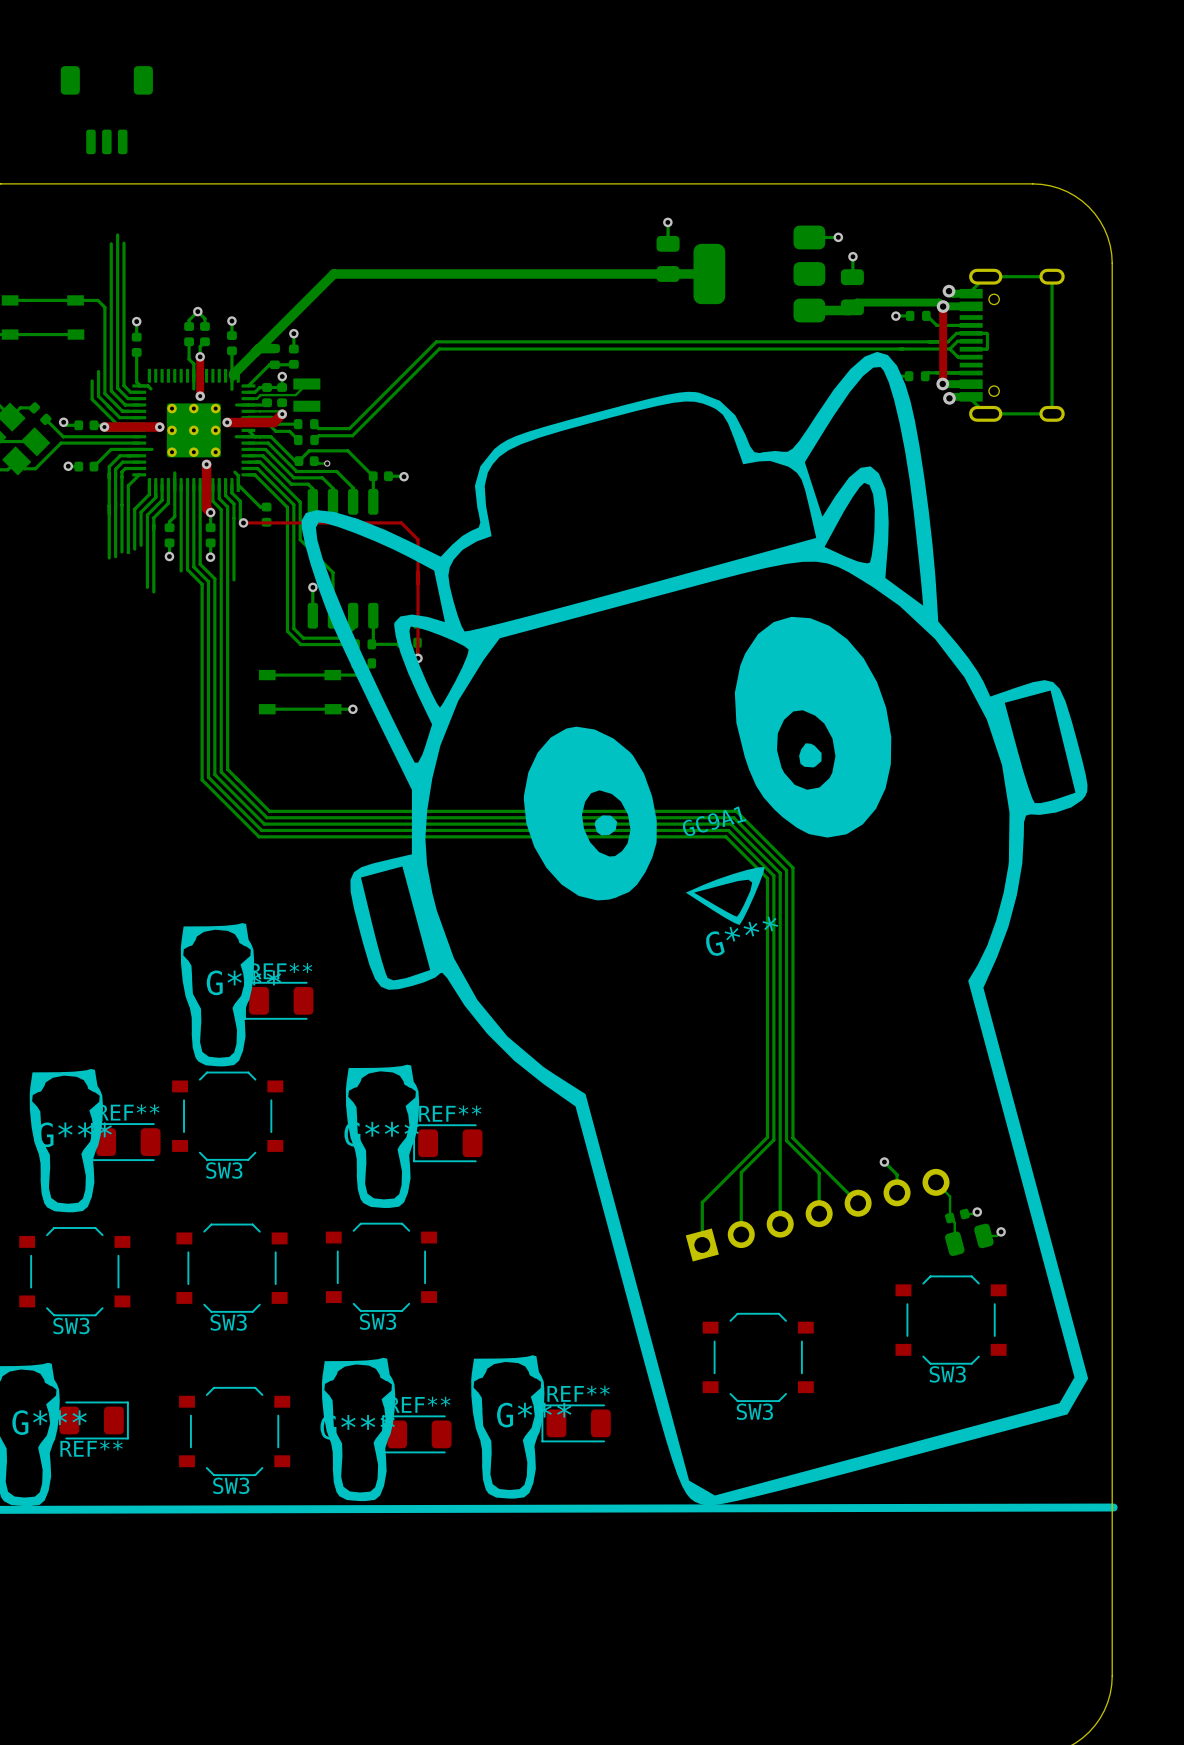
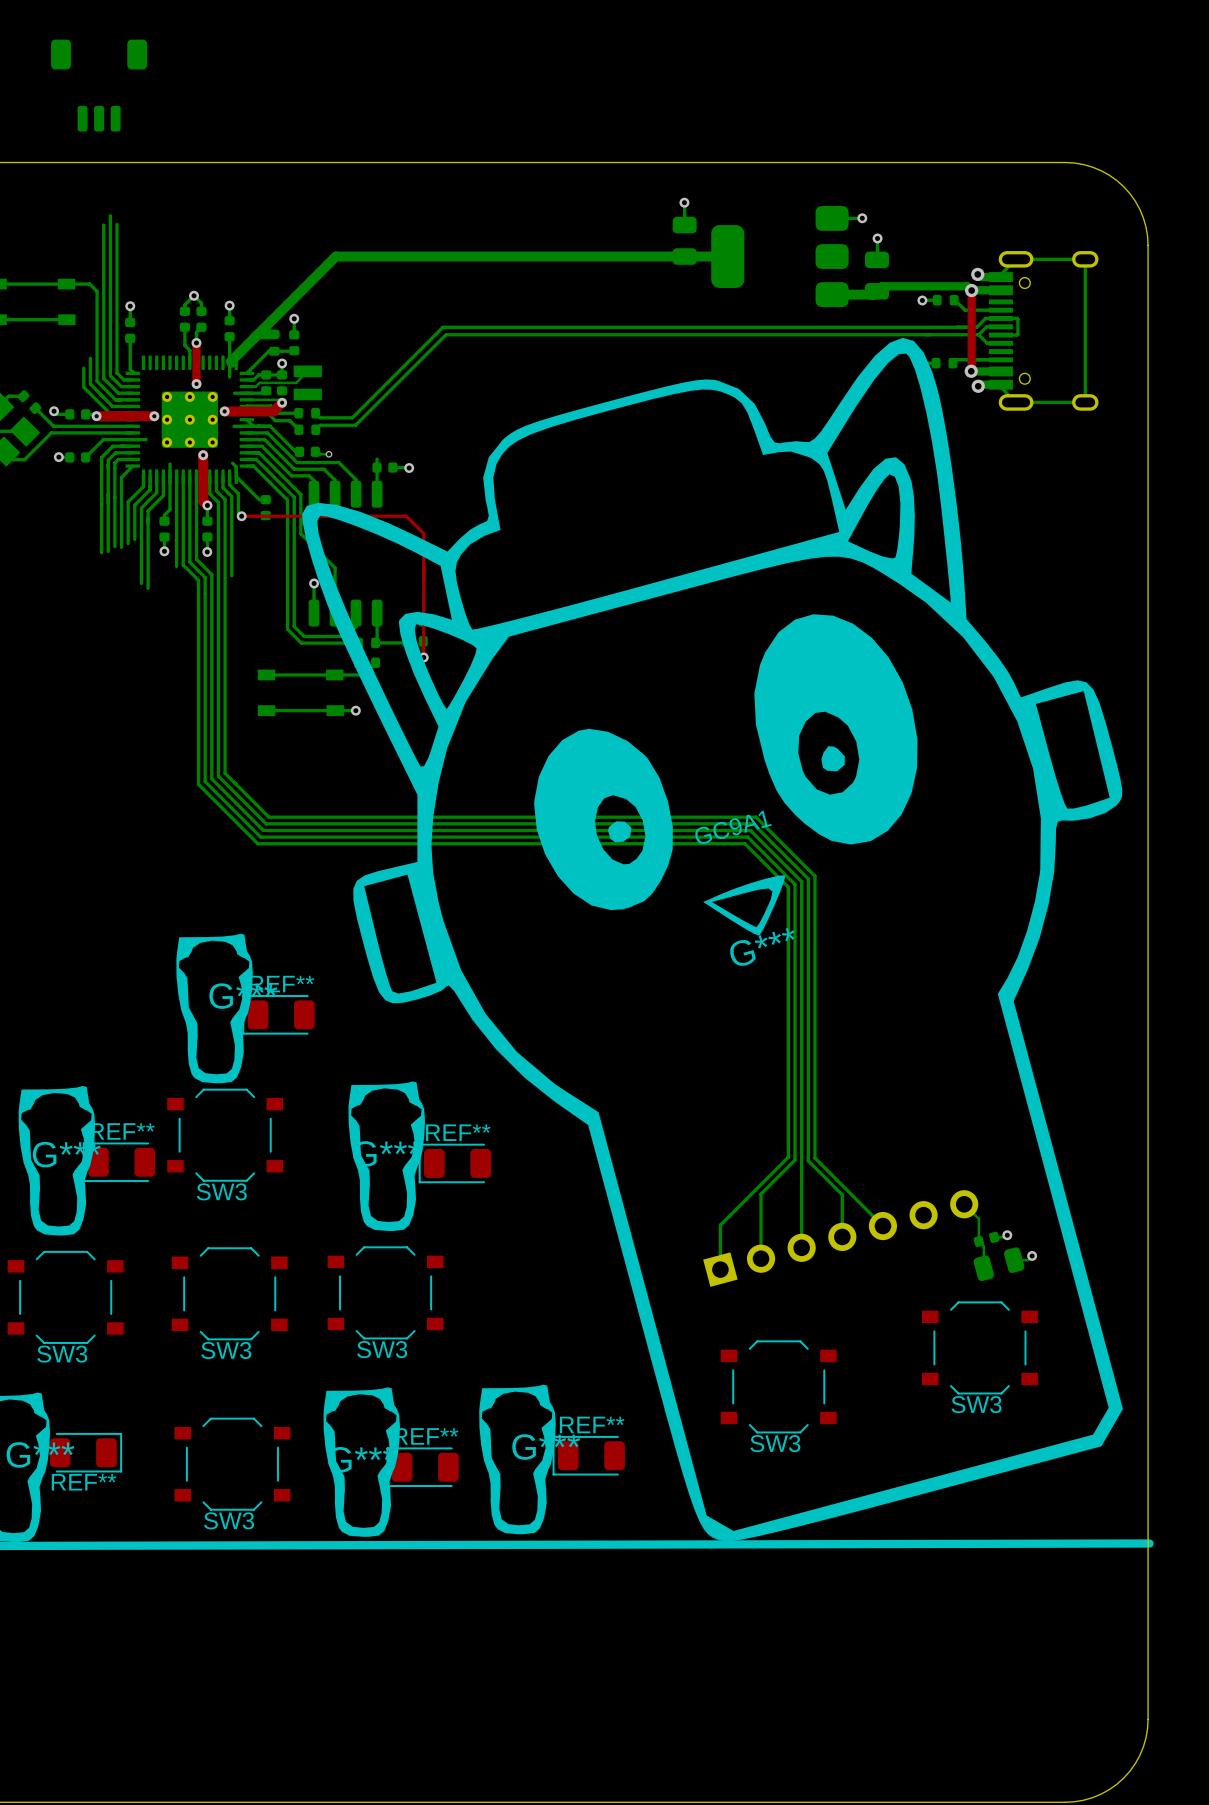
bottom track: (193, 375) (193, 388) -> none
bottom track: (139, 385) (148, 385) (150, 388) -> none
bottom track: (298, 461) (309, 450) (347, 450) (373, 476) -> (377, 459) (377, 467)
bottom track: (884, 1162) (897, 1174) (897, 1192) -> none
via: (884, 1162) -> none

